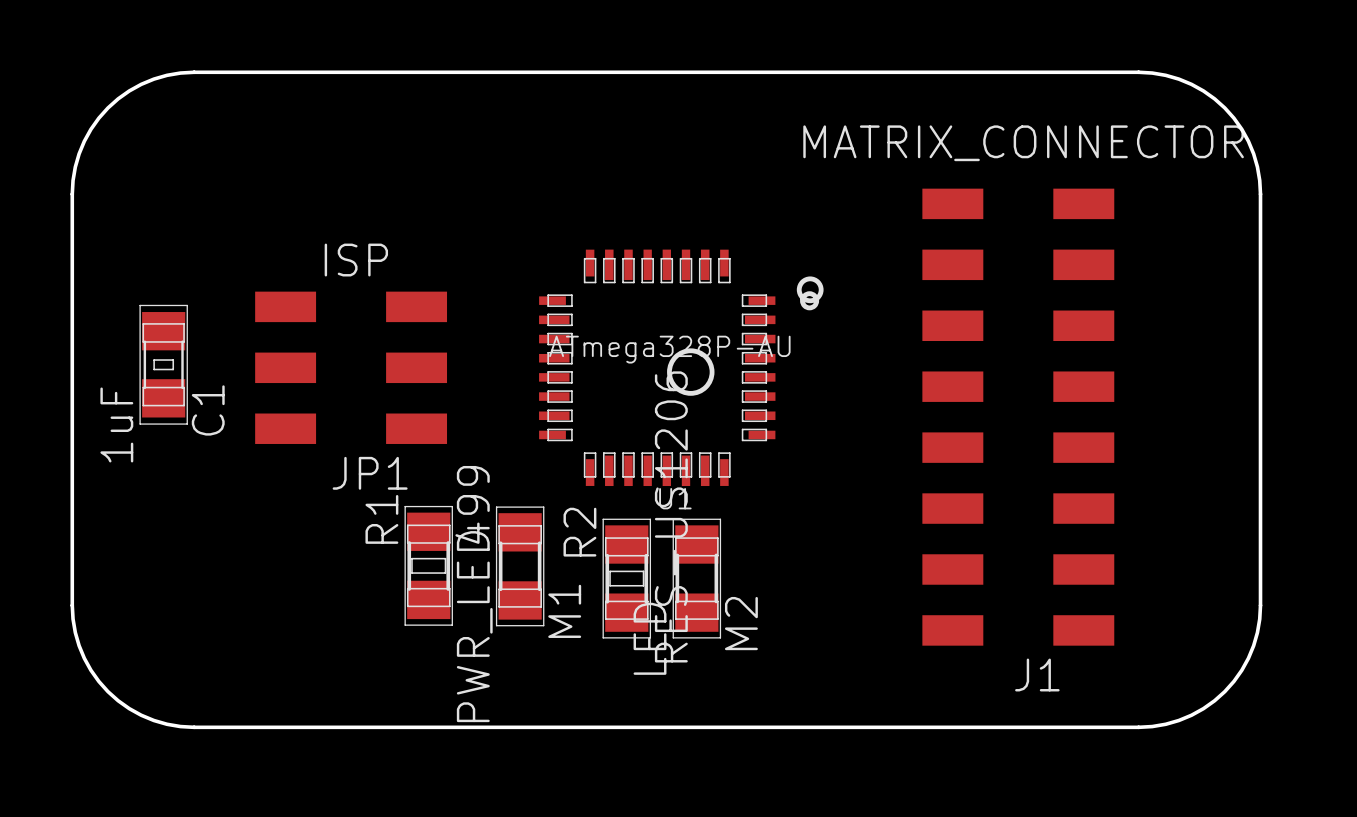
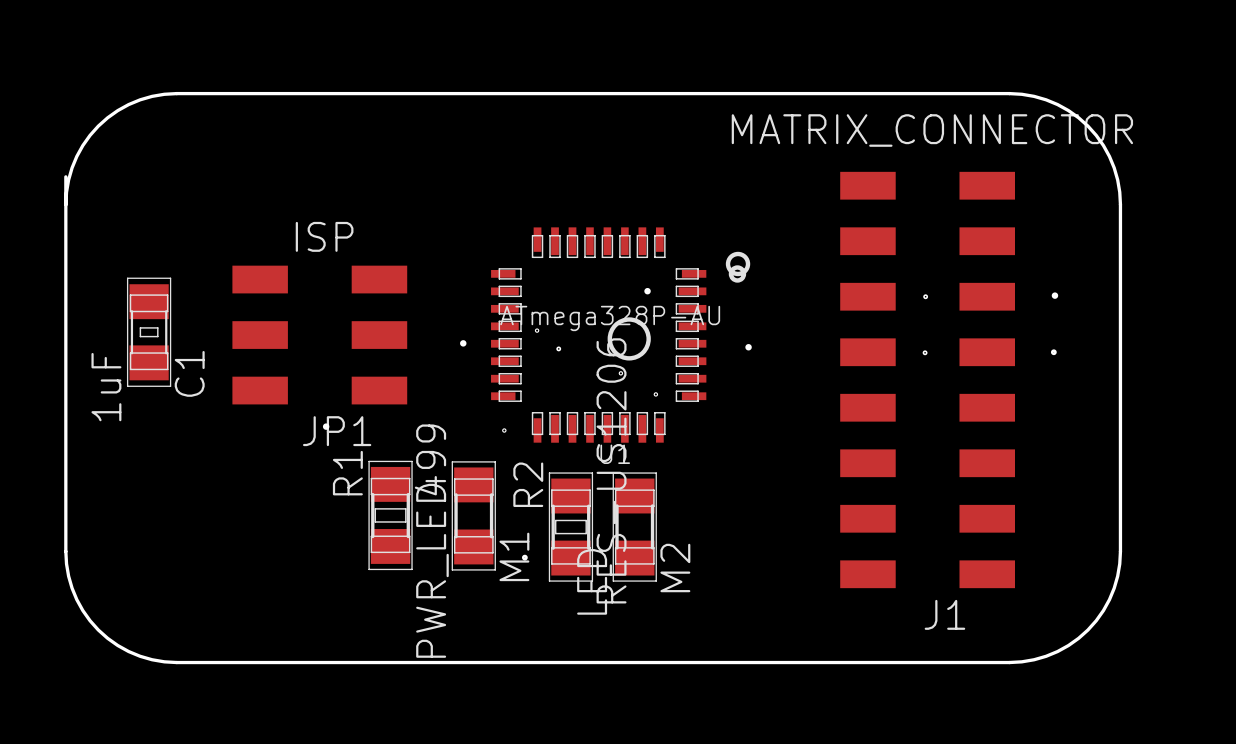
board edge: (72, 194) (73, 180) (79, 153) (84, 141) (98, 118) (118, 98) (141, 84) (167, 75) (180, 73) (1138, 72) (1165, 75) (1191, 84) (1214, 98) (1224, 107) (1241, 129) (1253, 153) (1259, 180) (1259, 619) (1253, 645) (1241, 670) (1233, 681) (1214, 700) (1191, 715) (1165, 724) (1138, 727) (1108, 727) -> (65, 204) (68, 179) (76, 156) (98, 126) (128, 104) (164, 94) (1009, 93) (1034, 96) (1057, 104) (1078, 117) (1103, 145) (1114, 167) (1119, 192) (1119, 563) (1109, 599) (1087, 630) (1068, 645) (1046, 656) (1009, 662)
round board edge: none -> [644, 287, 651, 295]
round board edge: none -> [1051, 292, 1059, 299]
round board edge: none -> [923, 294, 929, 300]
round board edge: none -> [534, 328, 540, 333]
round board edge: none -> [460, 340, 467, 347]
round board edge: none -> [745, 344, 752, 351]
round board edge: none -> [556, 346, 562, 352]
round board edge: none -> [1050, 349, 1057, 356]
round board edge: none -> [922, 350, 928, 356]
round board edge: none -> [618, 371, 624, 376]
round board edge: none -> [653, 392, 659, 397]
round board edge: none -> [322, 423, 330, 430]
round board edge: none -> [502, 428, 507, 433]
round board edge: none -> [521, 554, 528, 561]

